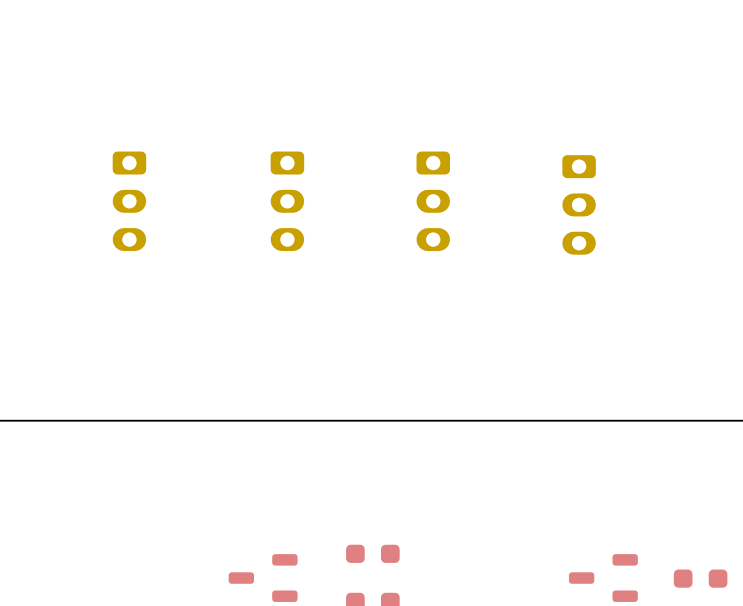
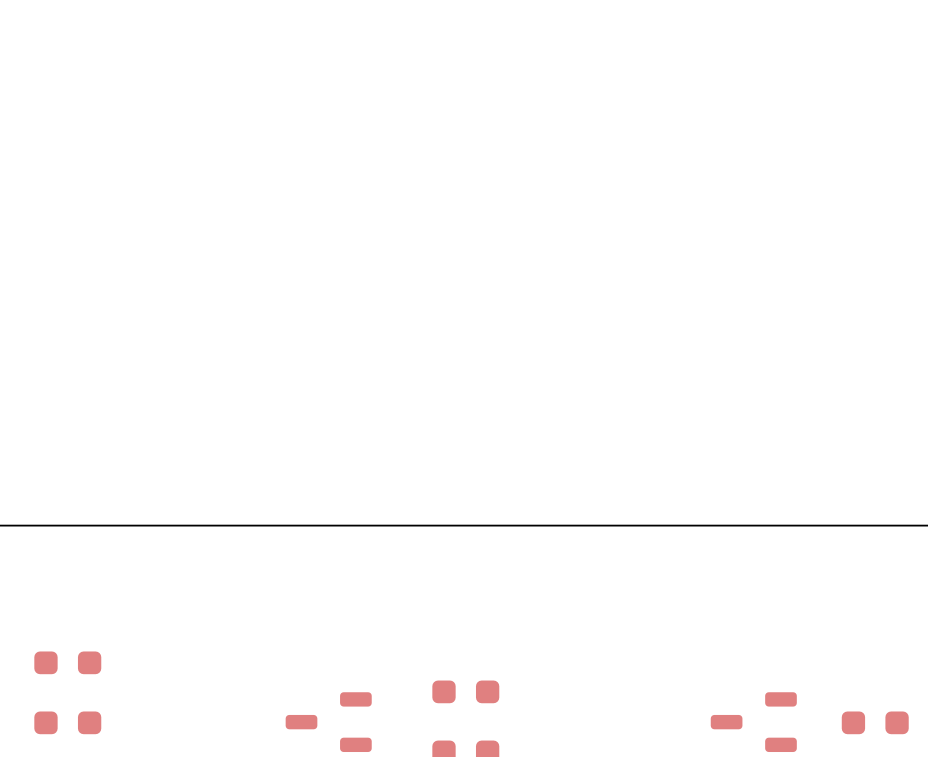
part: (129, 201) -> none
part: (287, 201) -> none
part: (433, 201) -> none
part: (579, 204) -> none
part: none -> (67, 662)
part: none -> (67, 722)

